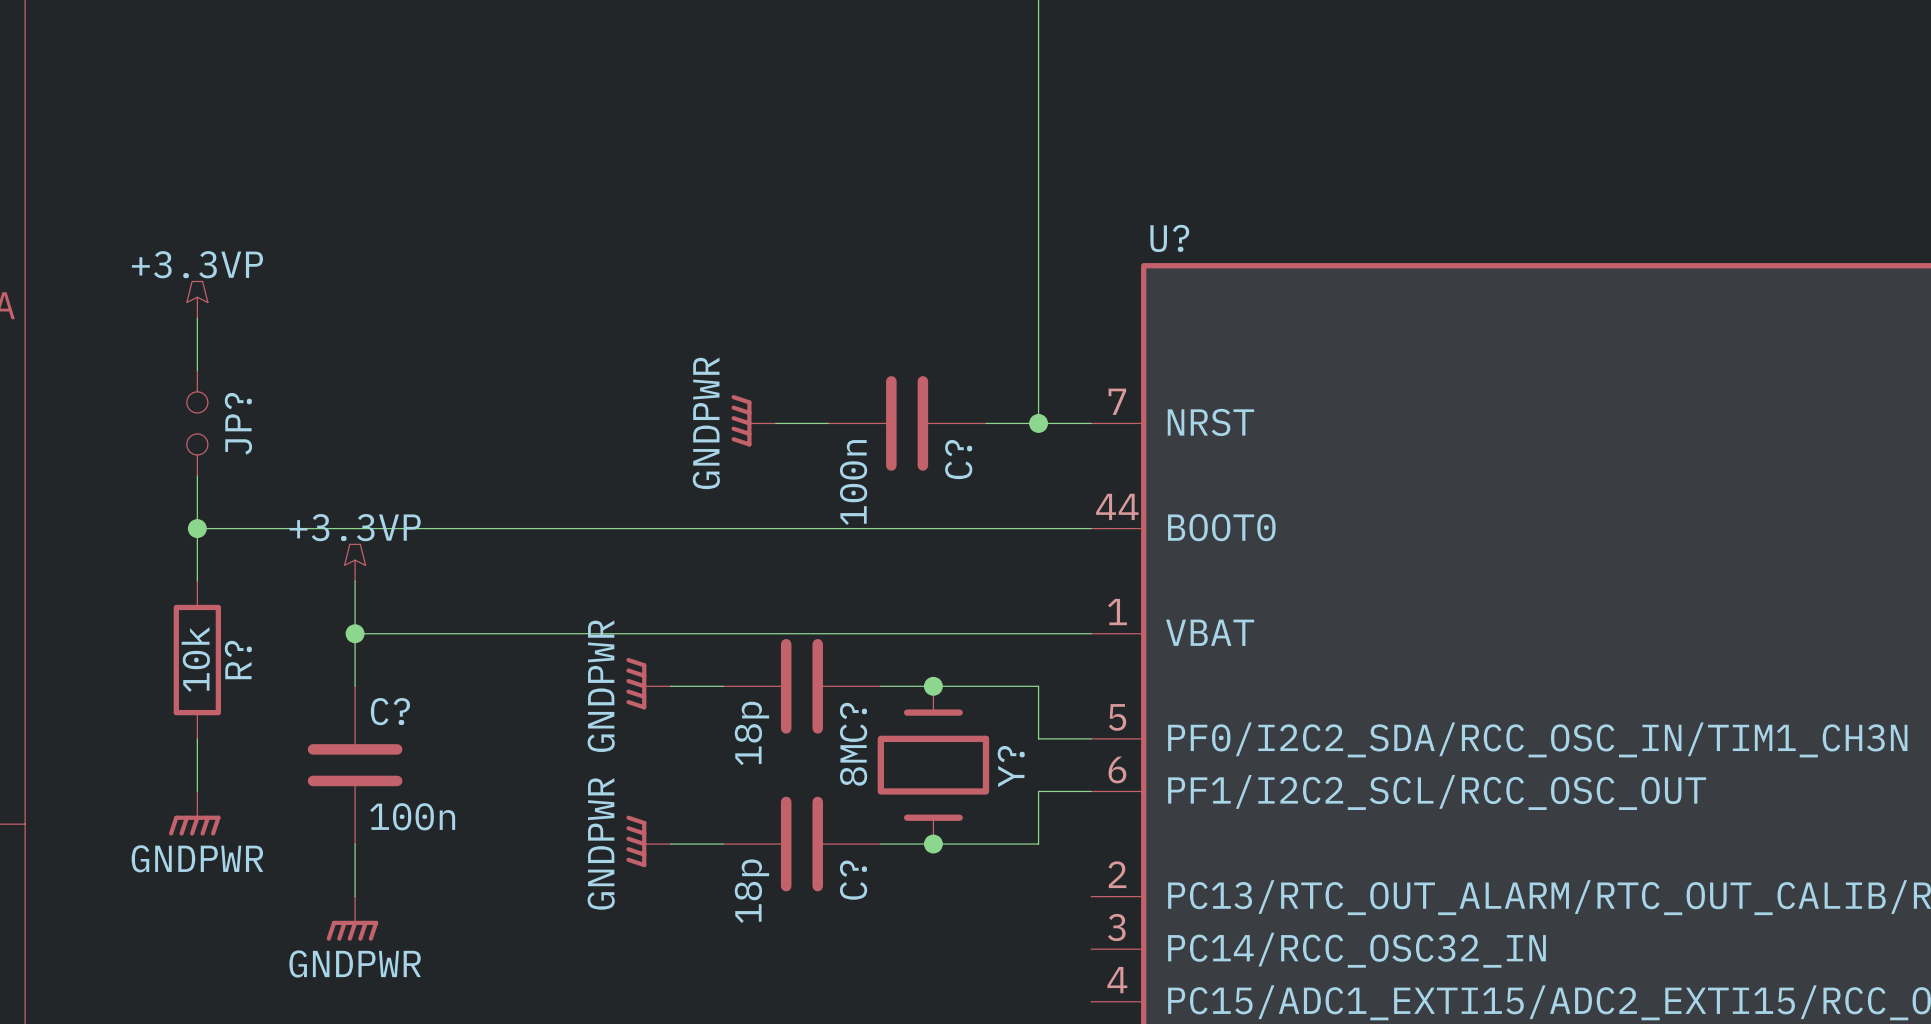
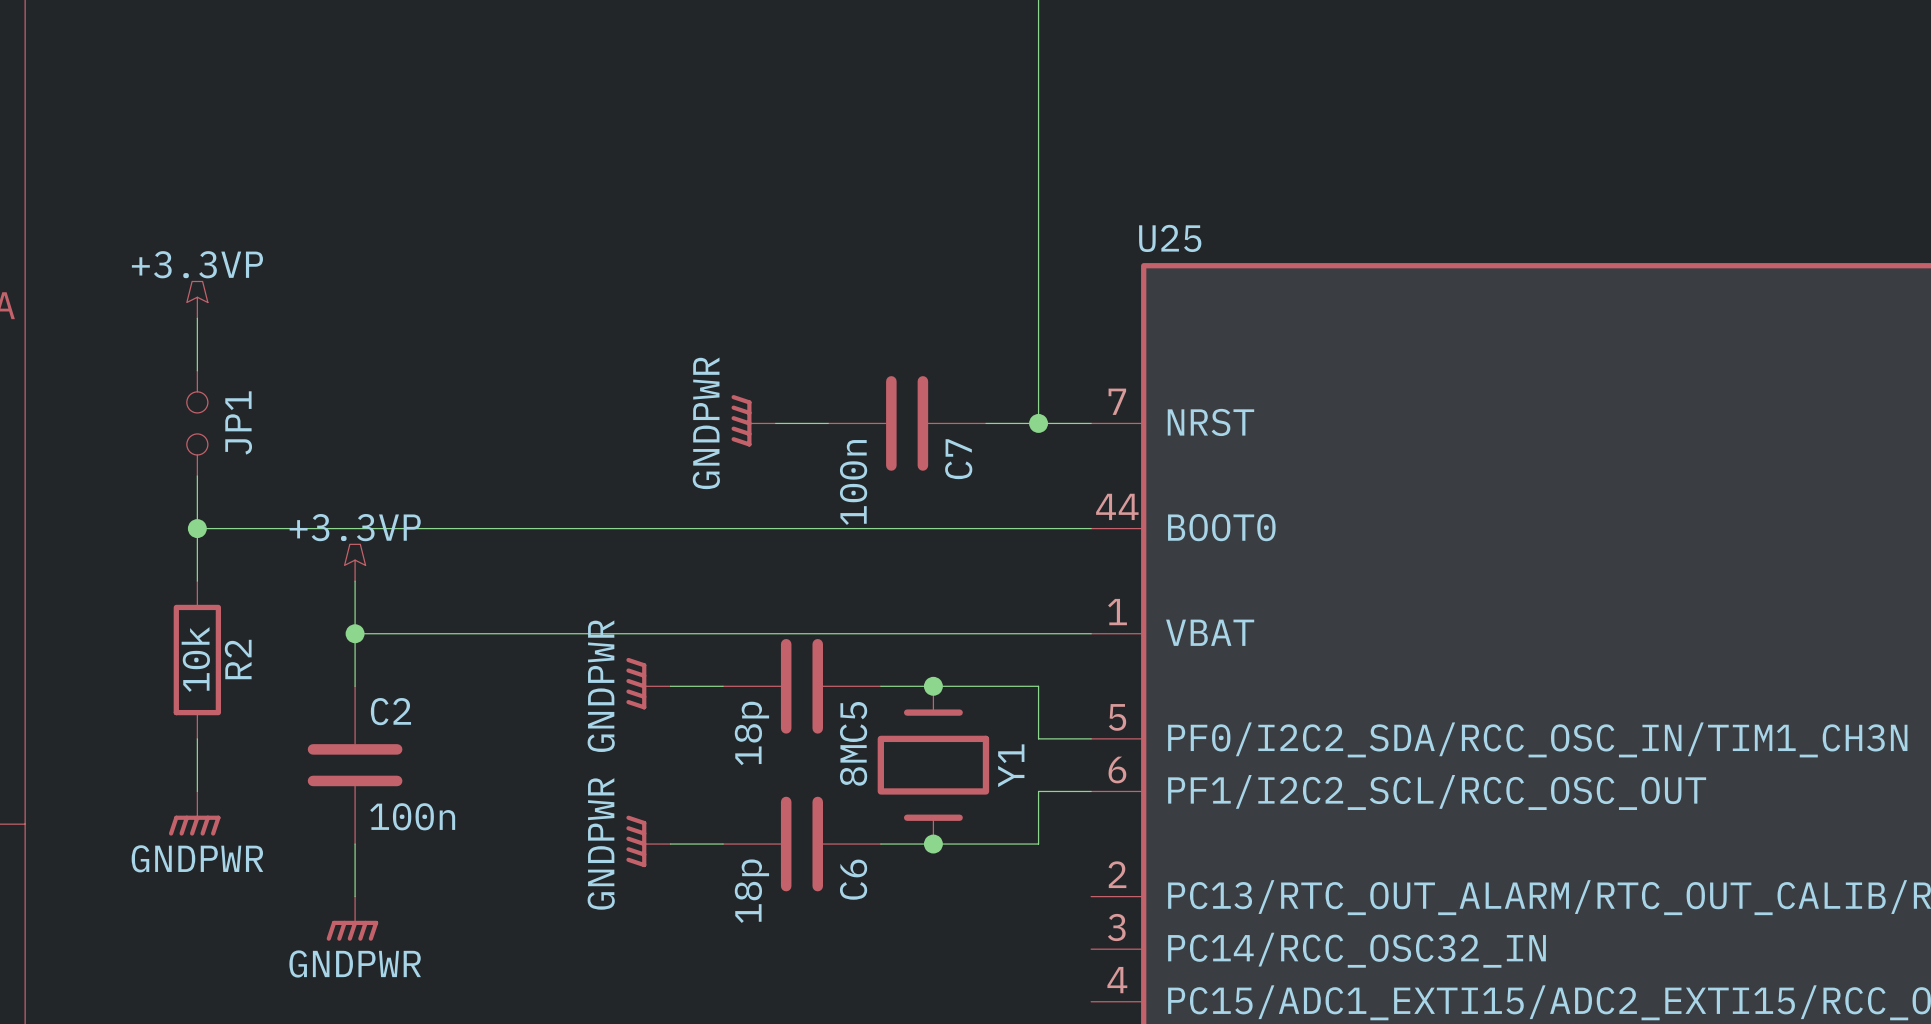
U? name: U? (1169, 238) -> U25 (1170, 238)
JP? name: JP? (238, 423) -> JP1 (238, 422)
C? name: C? (958, 459) -> C7 (958, 459)
R? name: R? (238, 660) -> R2 (238, 659)
C? name: C? (390, 711) -> C2 (390, 711)
C? name: C? (853, 722) -> C5 (853, 721)
Y? name: Y? (1011, 766) -> Y1 (1011, 765)
C? name: C? (853, 880) -> C6 (853, 879)

